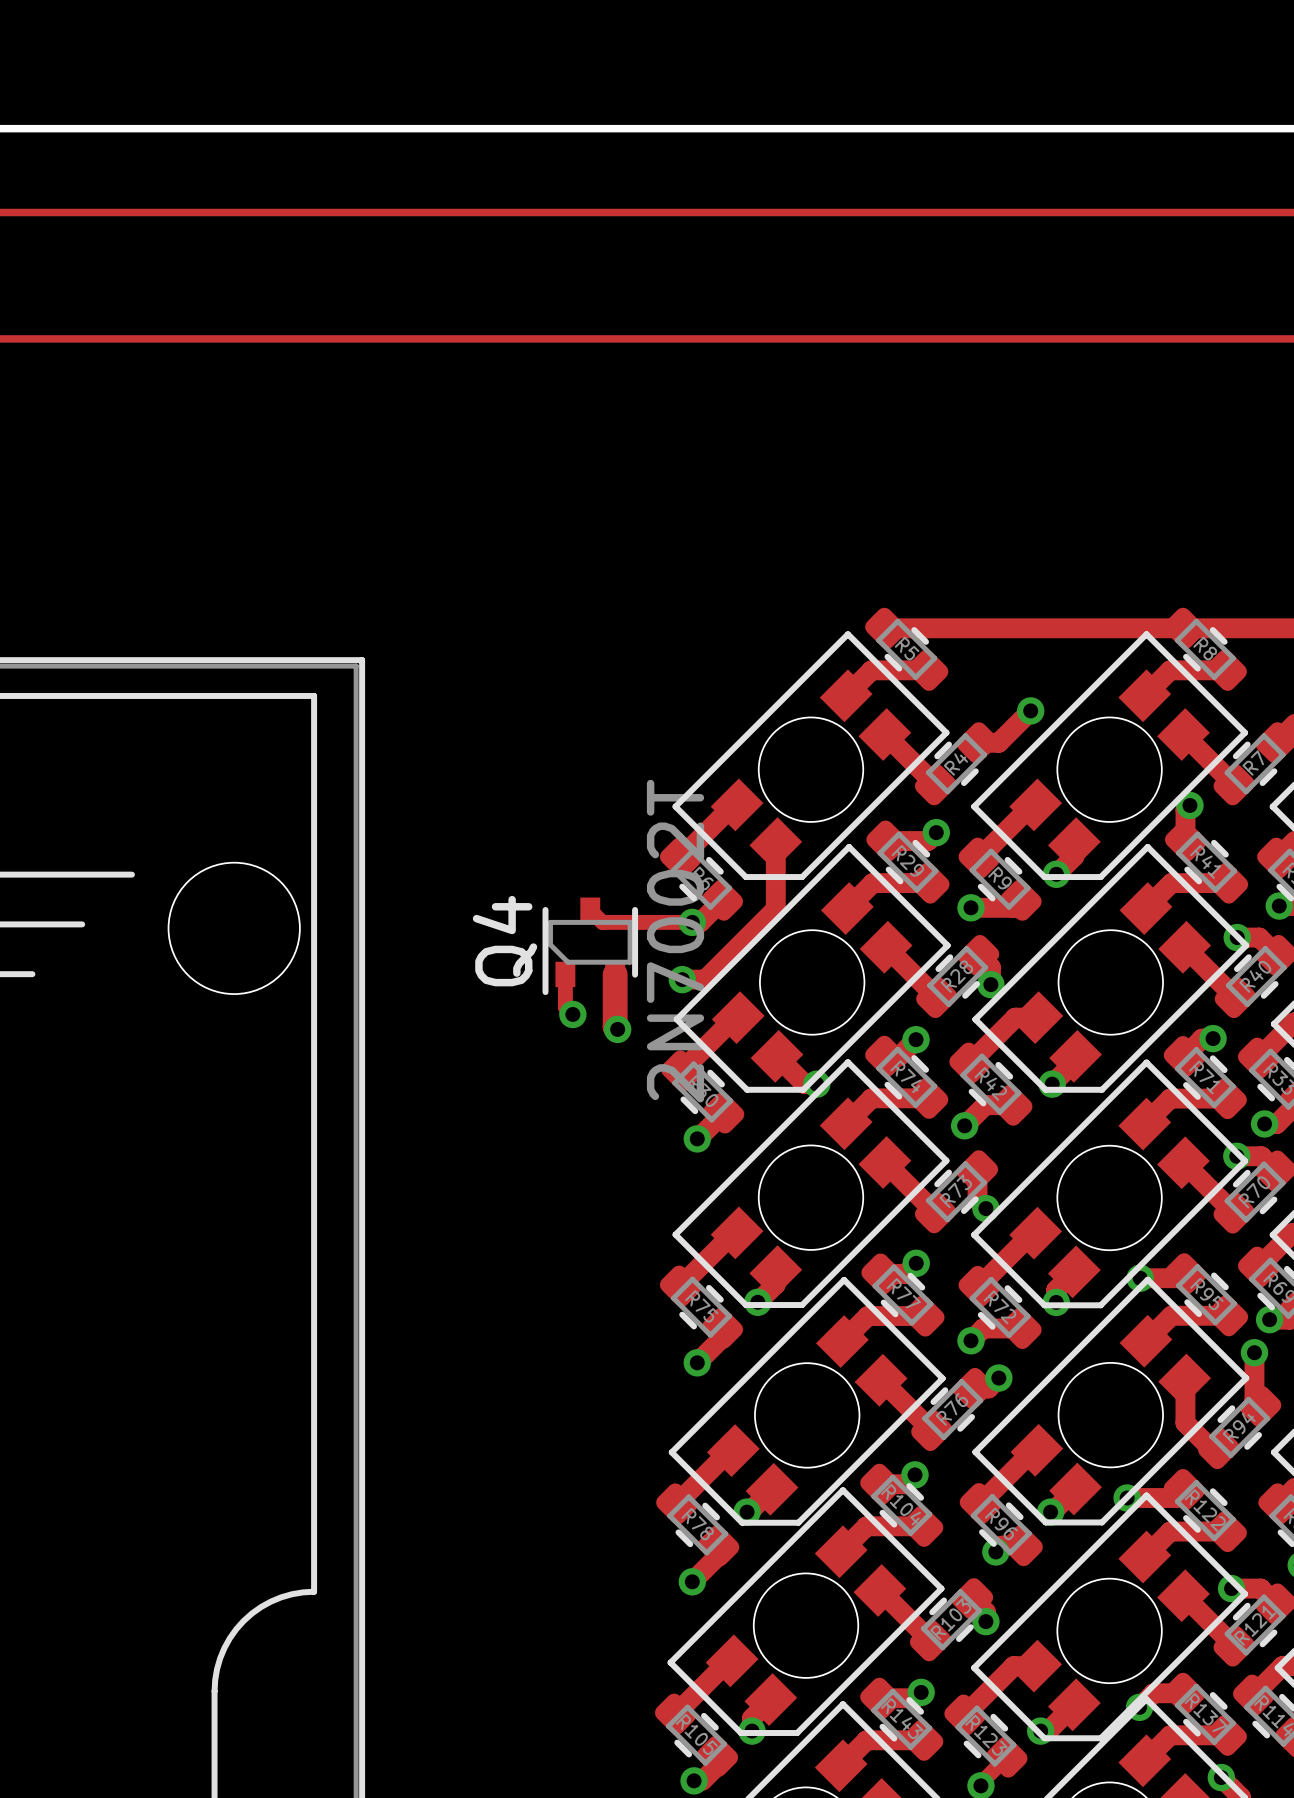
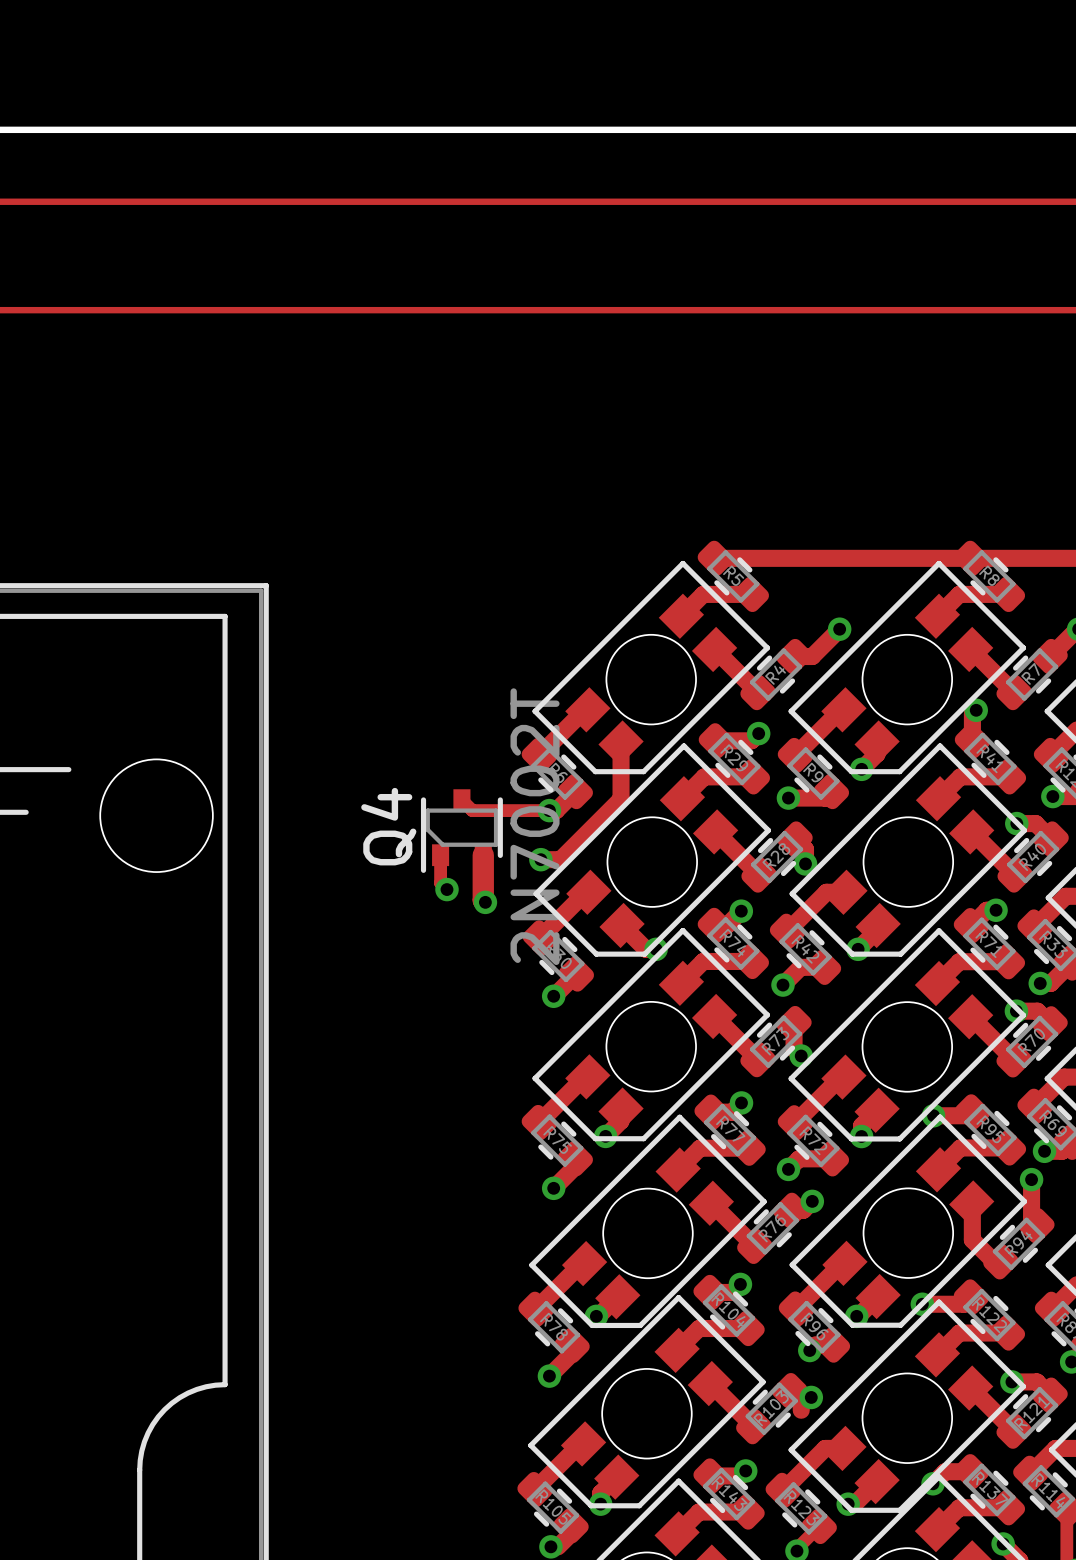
via position: (985, 1621) -> (811, 1397)

